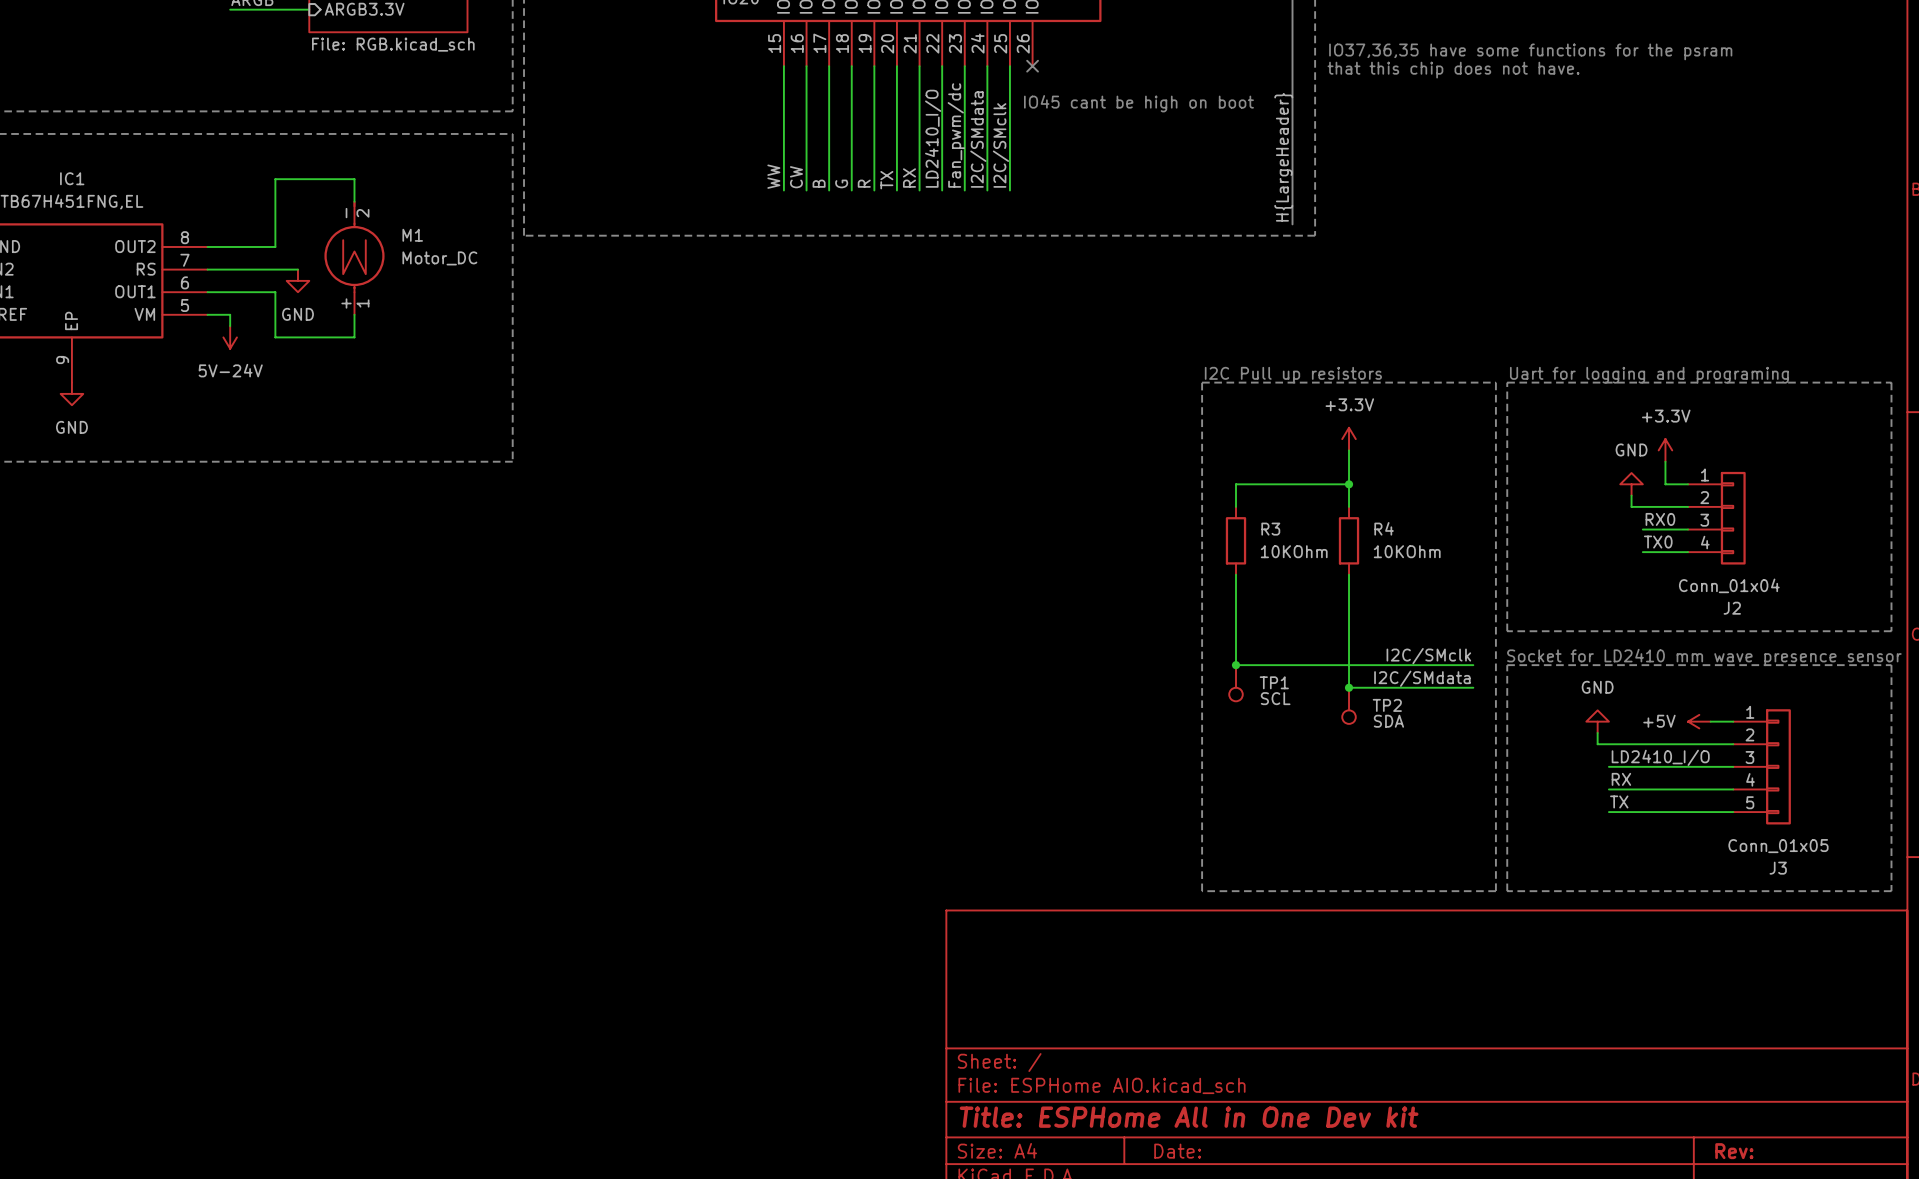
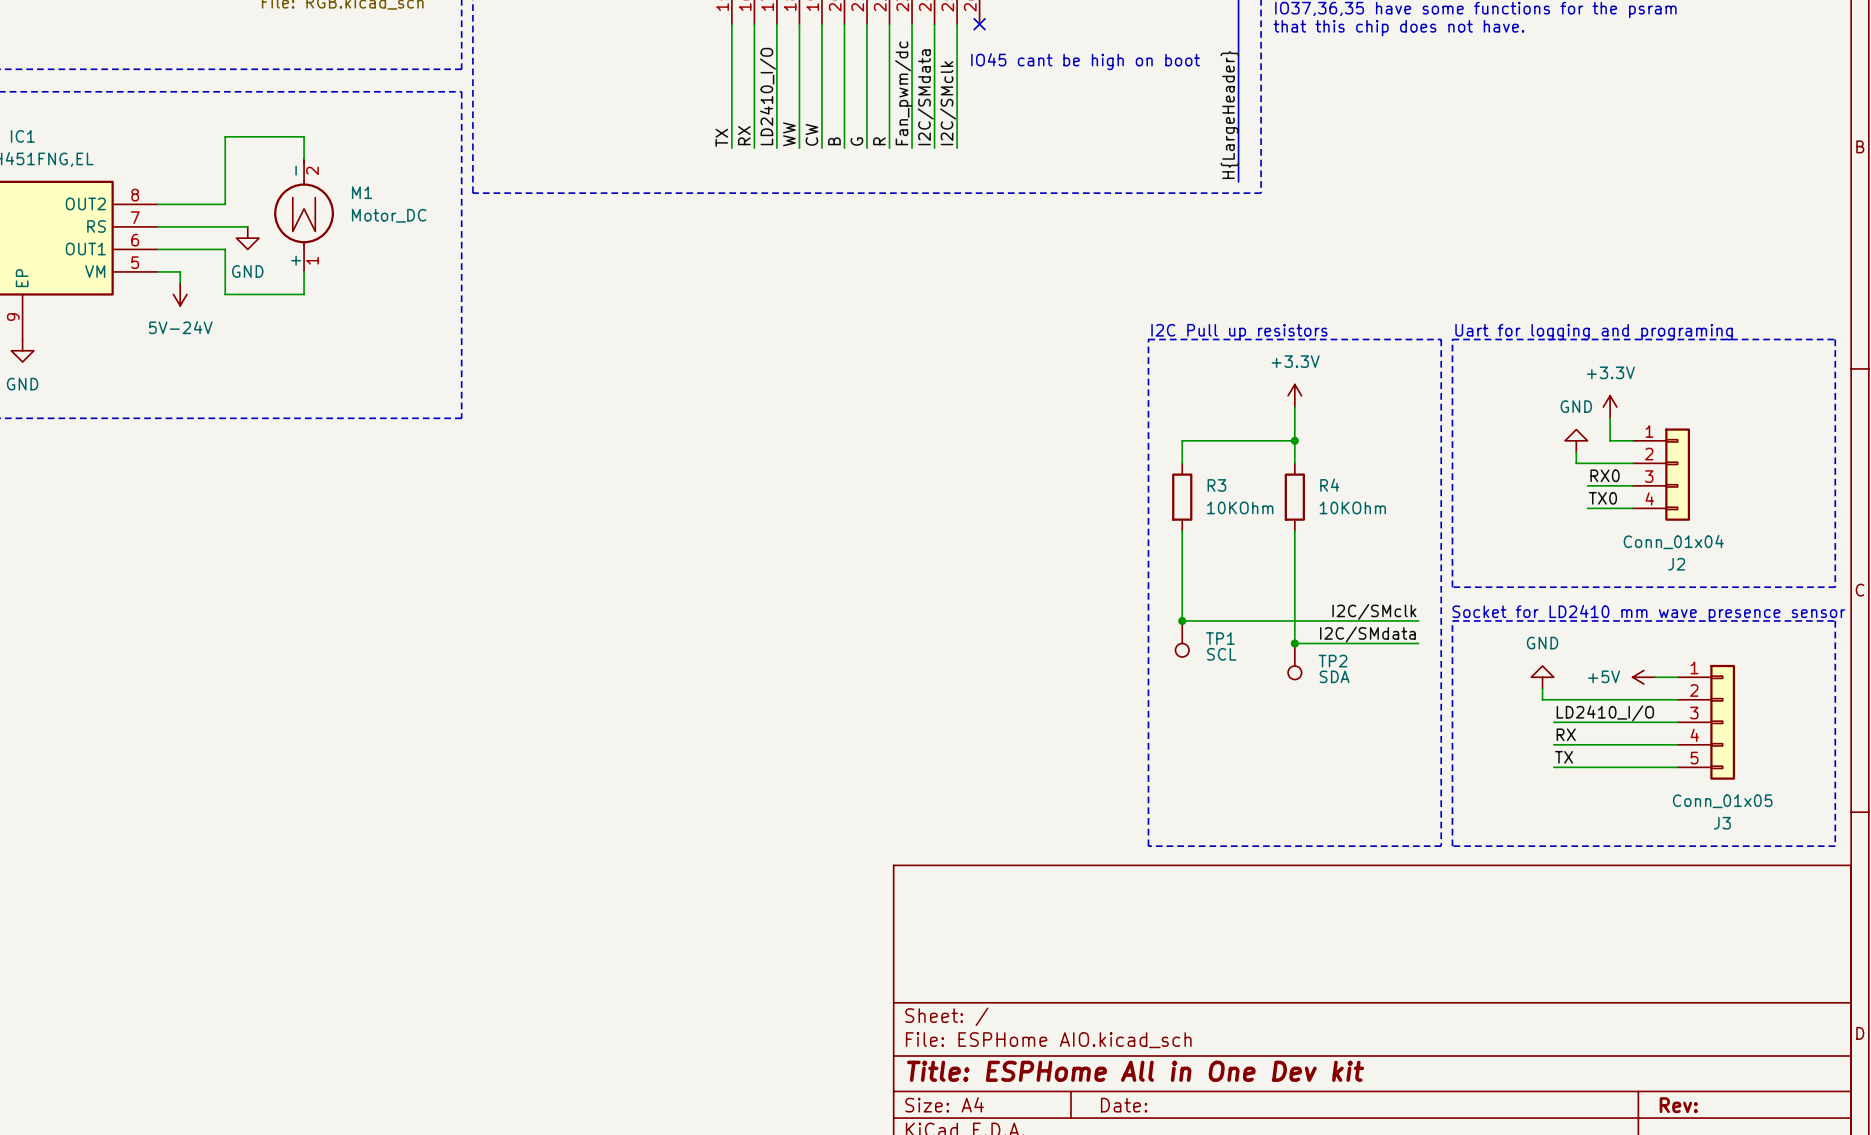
label: LD2410_I/O (933, 138) -> R (879, 141)
label: WW (773, 176) -> TX (721, 137)
label: CW (796, 177) -> RX (744, 135)
label: RX (909, 178) -> G (856, 141)
label: TX (886, 180) -> B (834, 141)
label: B (819, 183) -> LD2410_I/O (767, 96)
label: G (841, 183) -> WW (789, 134)
label: R (864, 183) -> CW (811, 134)

